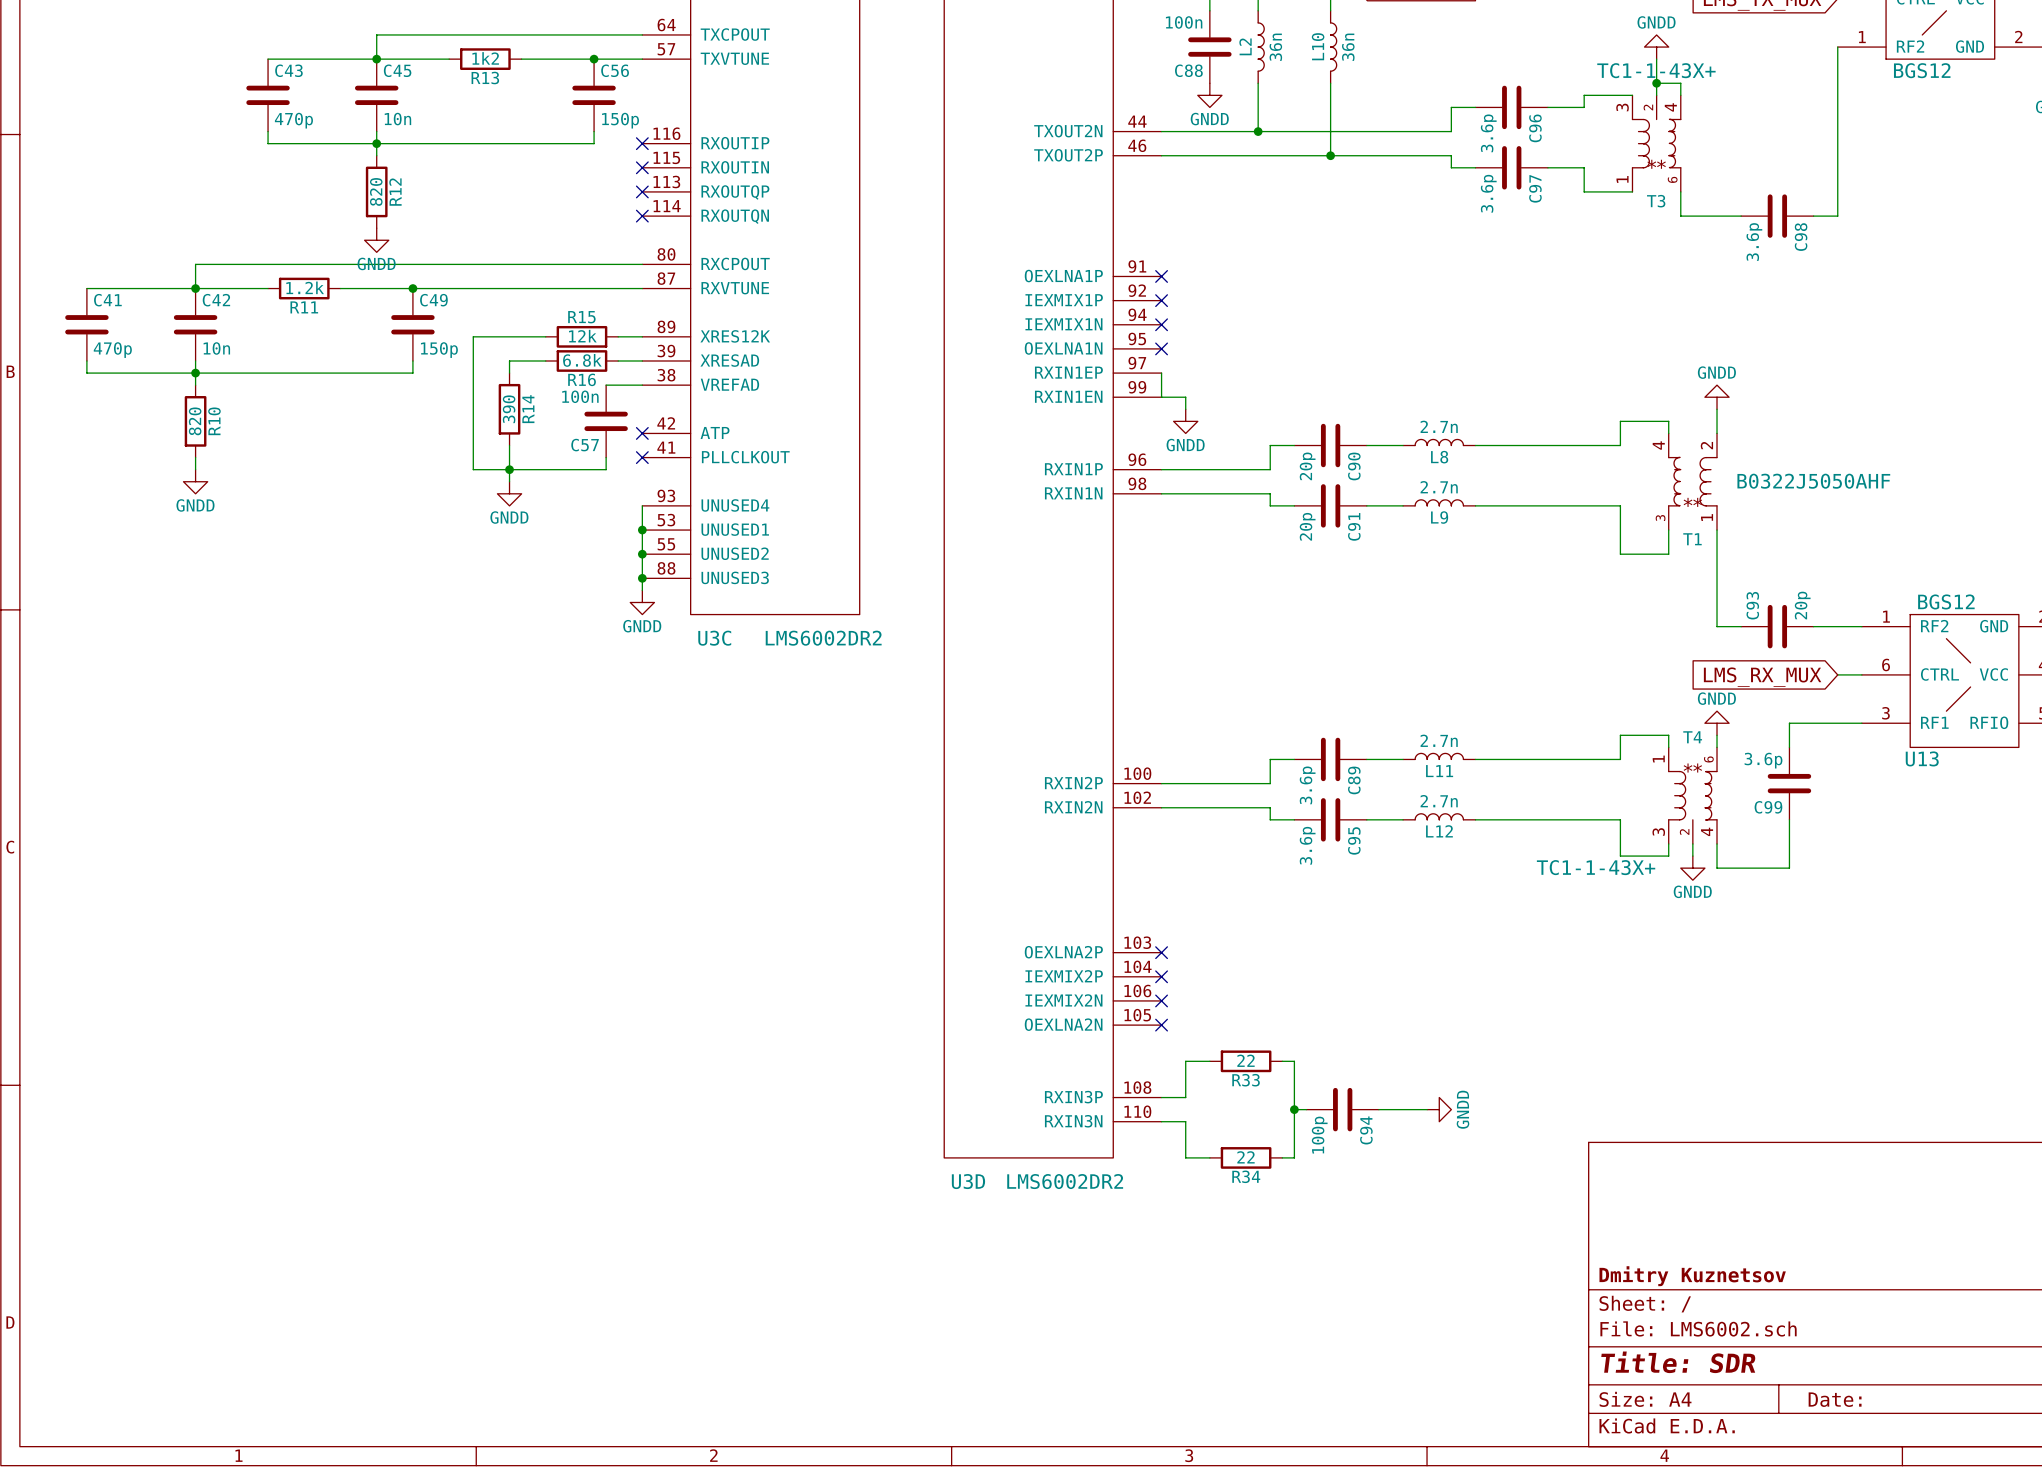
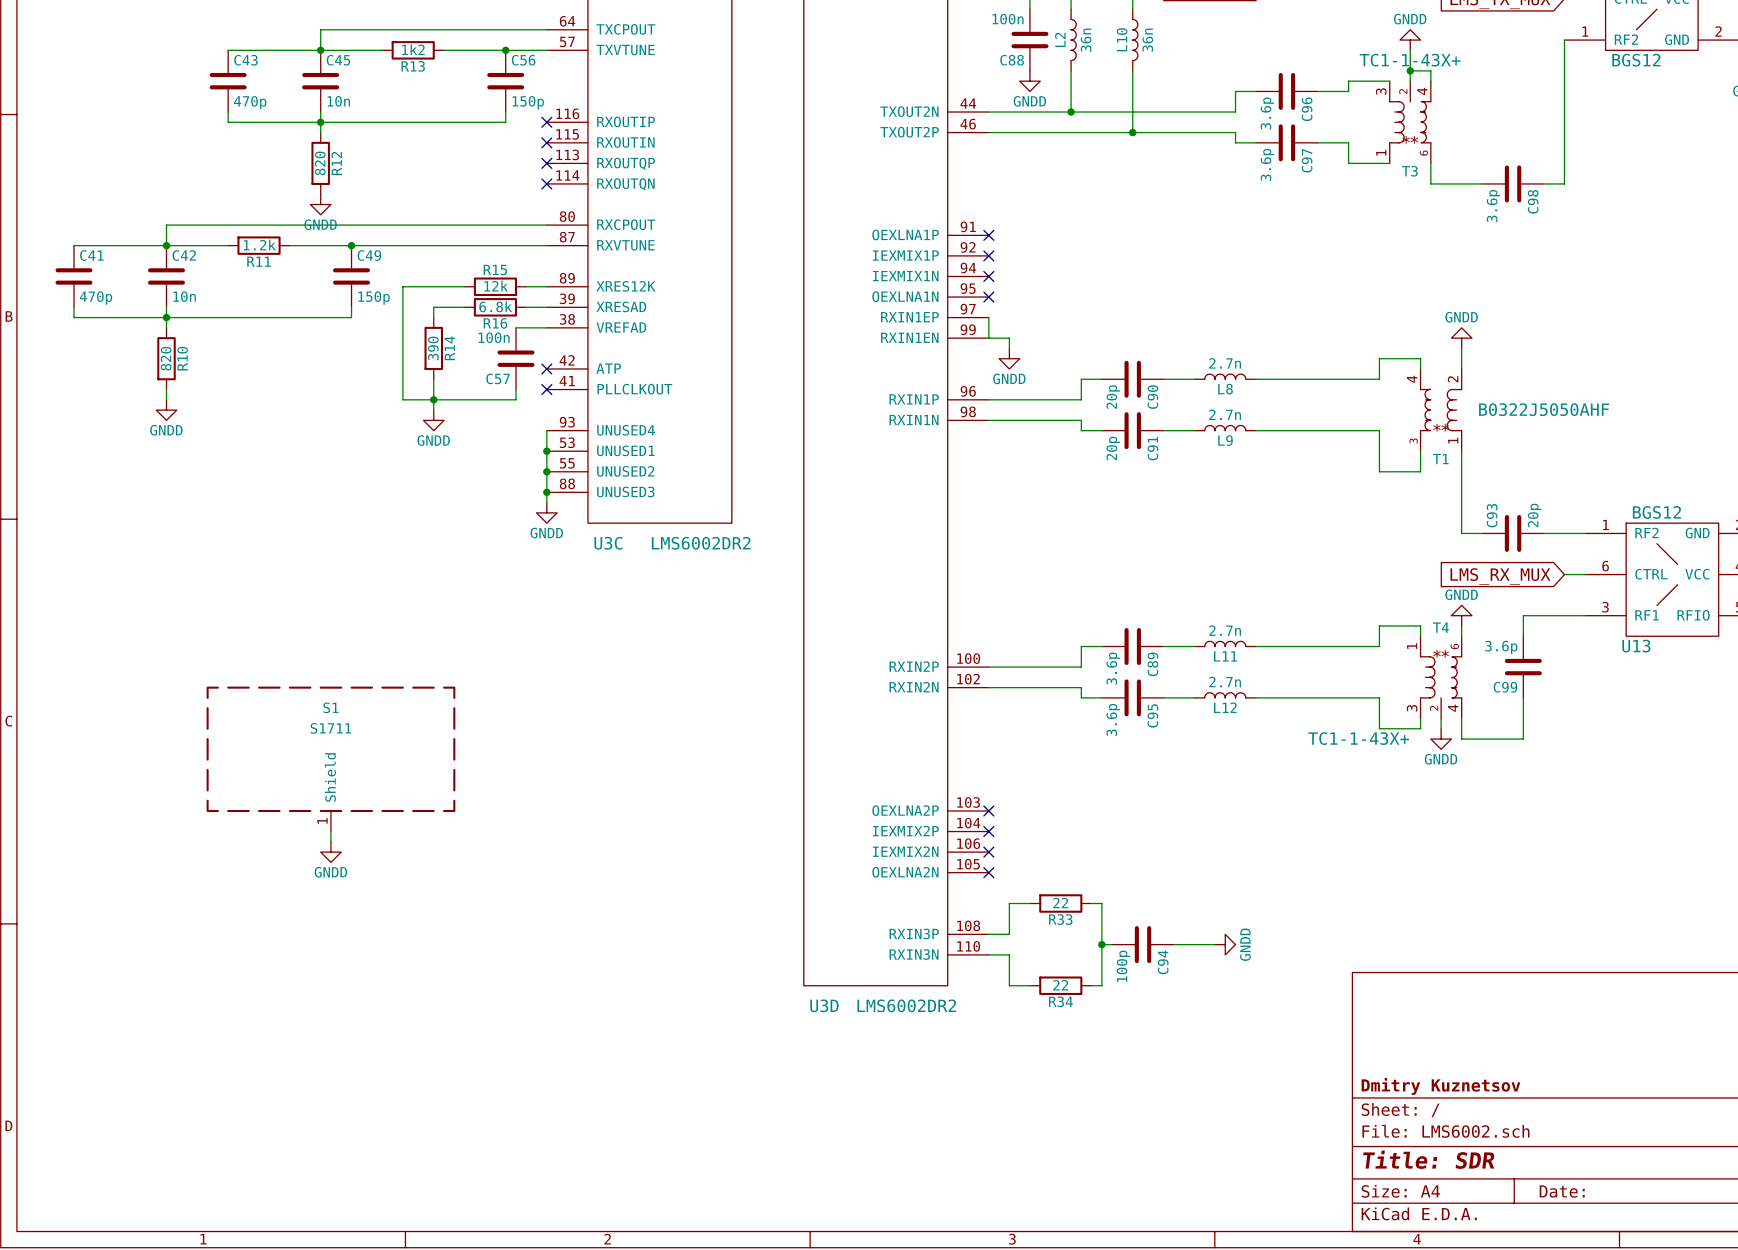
S1: none -> S1711 (330, 759)
wire: none -> (330, 831) (330, 841)
power symbol: none -> GNDD (330, 852)

